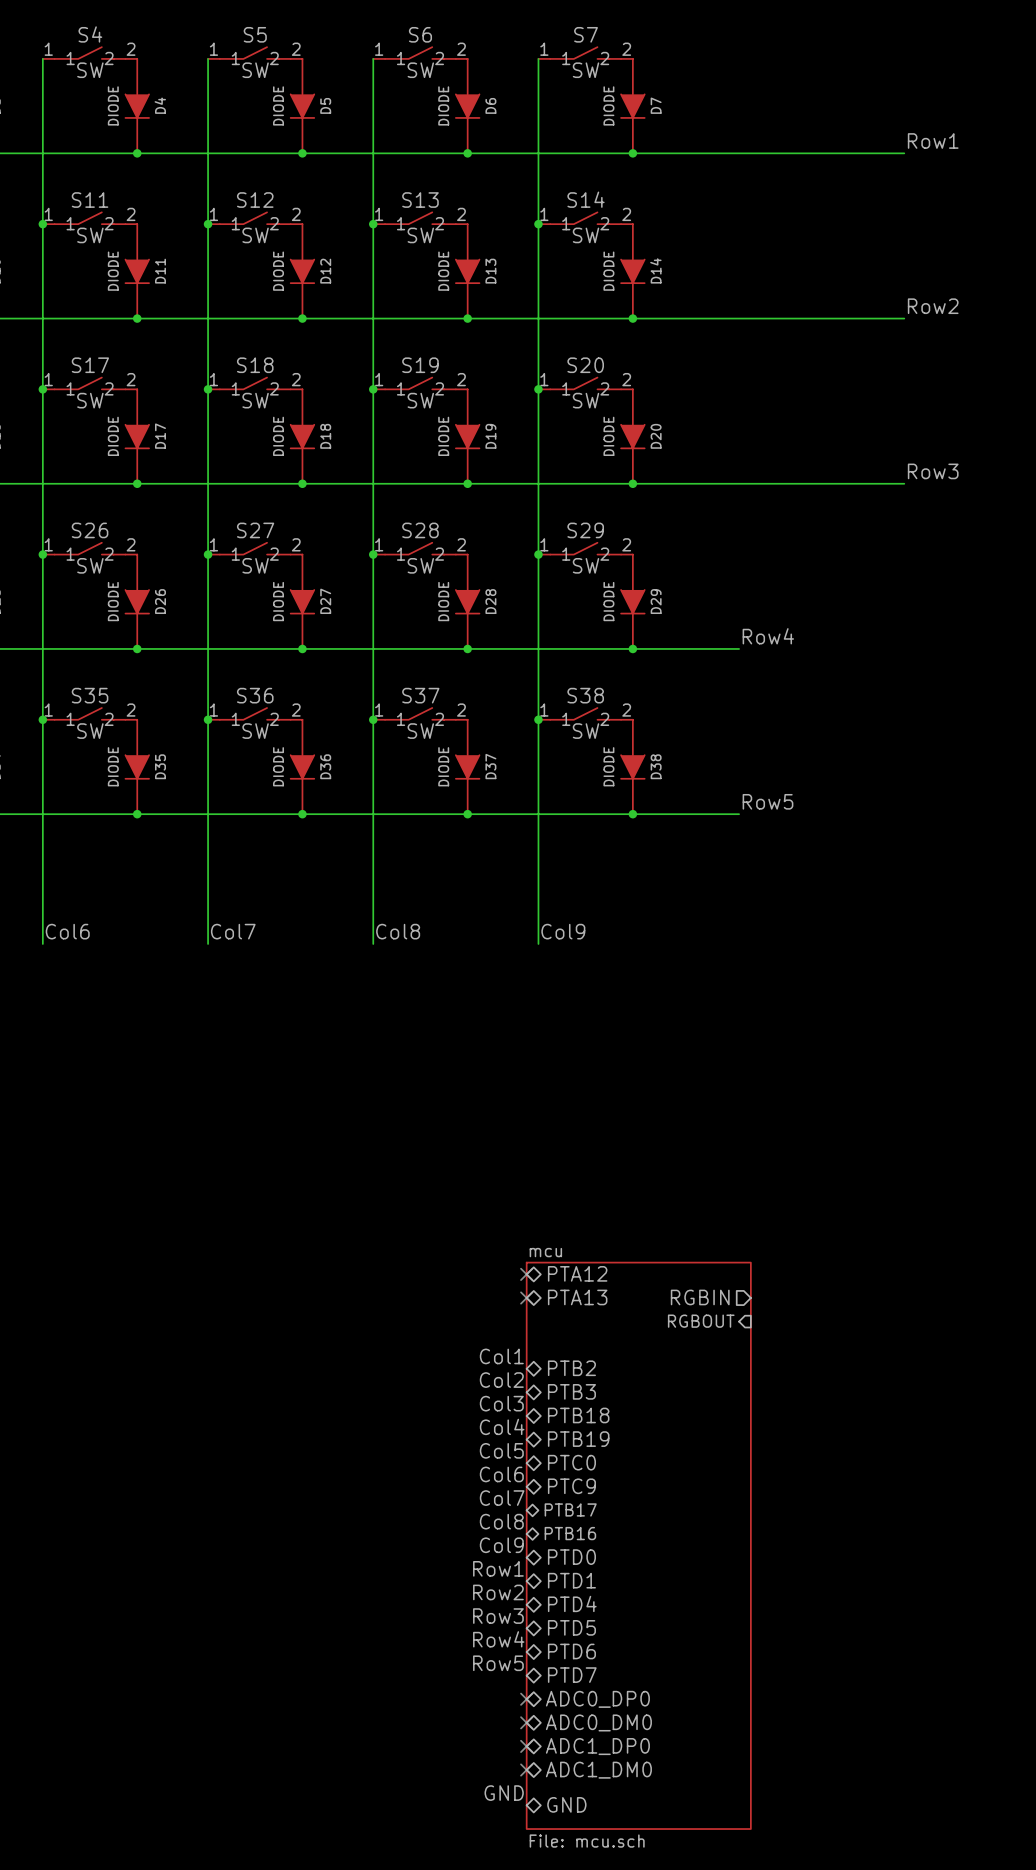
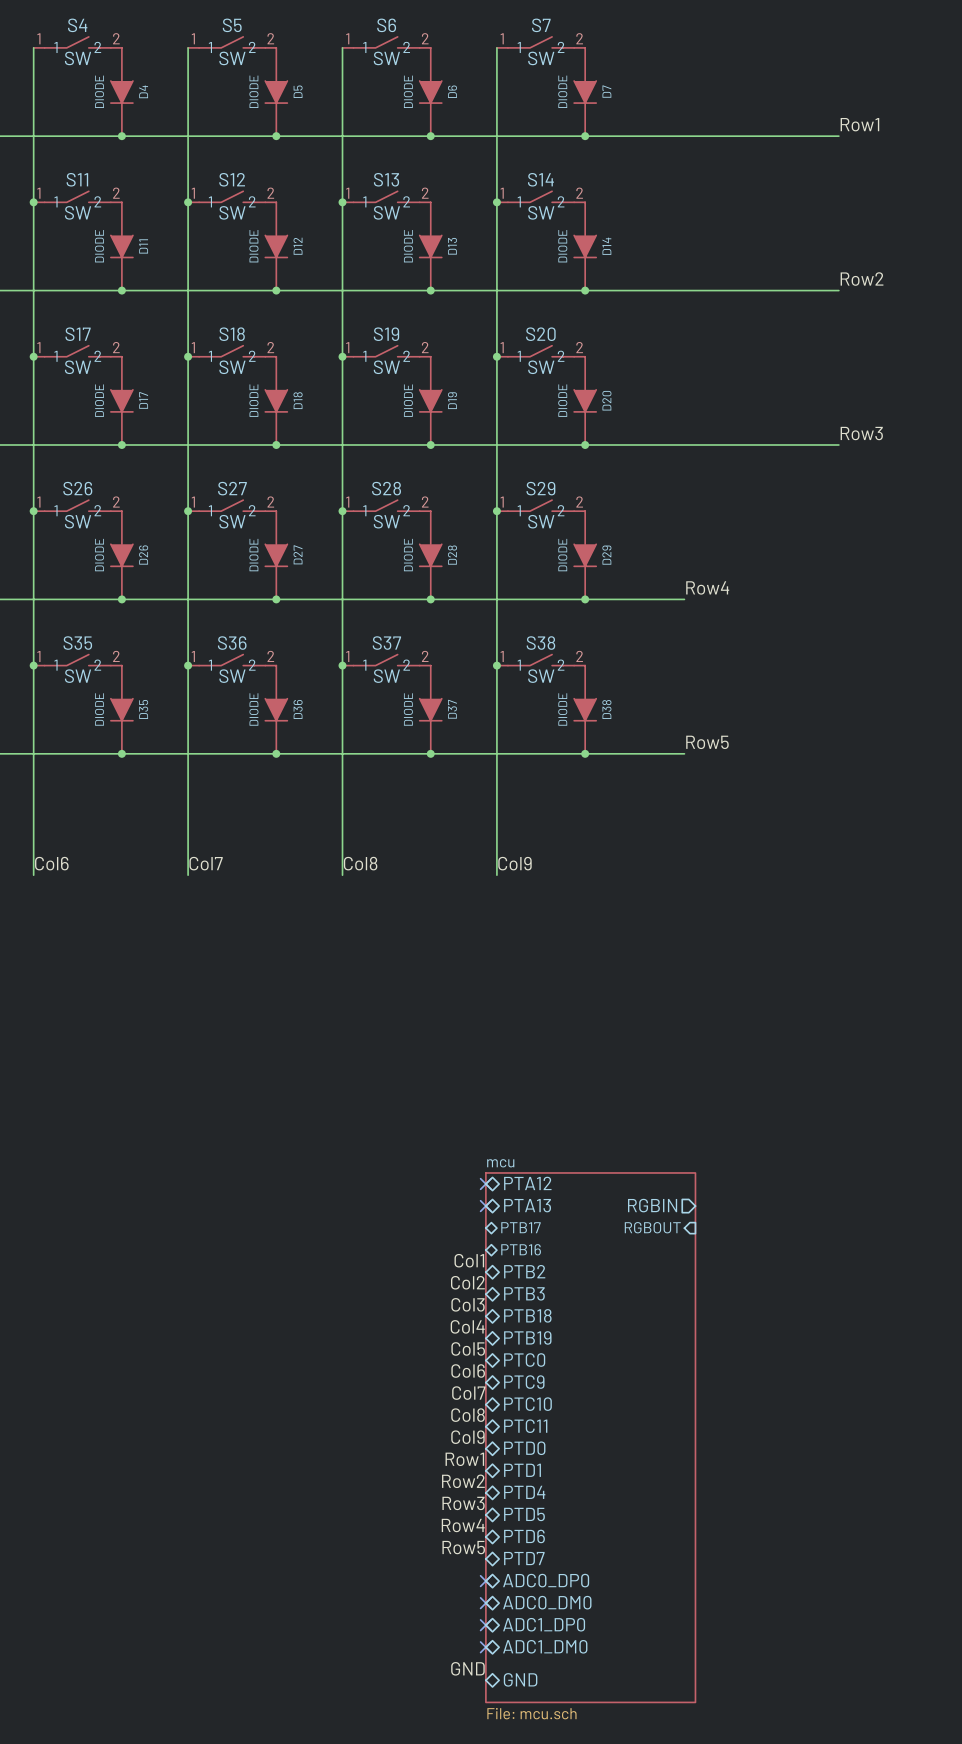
sheet pin position: PTB17 (570, 1509) -> PTB17 (520, 1227)
sheet pin: none -> PTC10 (527, 1404)
sheet pin position: PTB16 (570, 1533) -> PTB16 (521, 1249)
sheet pin: none -> PTC11 (525, 1426)

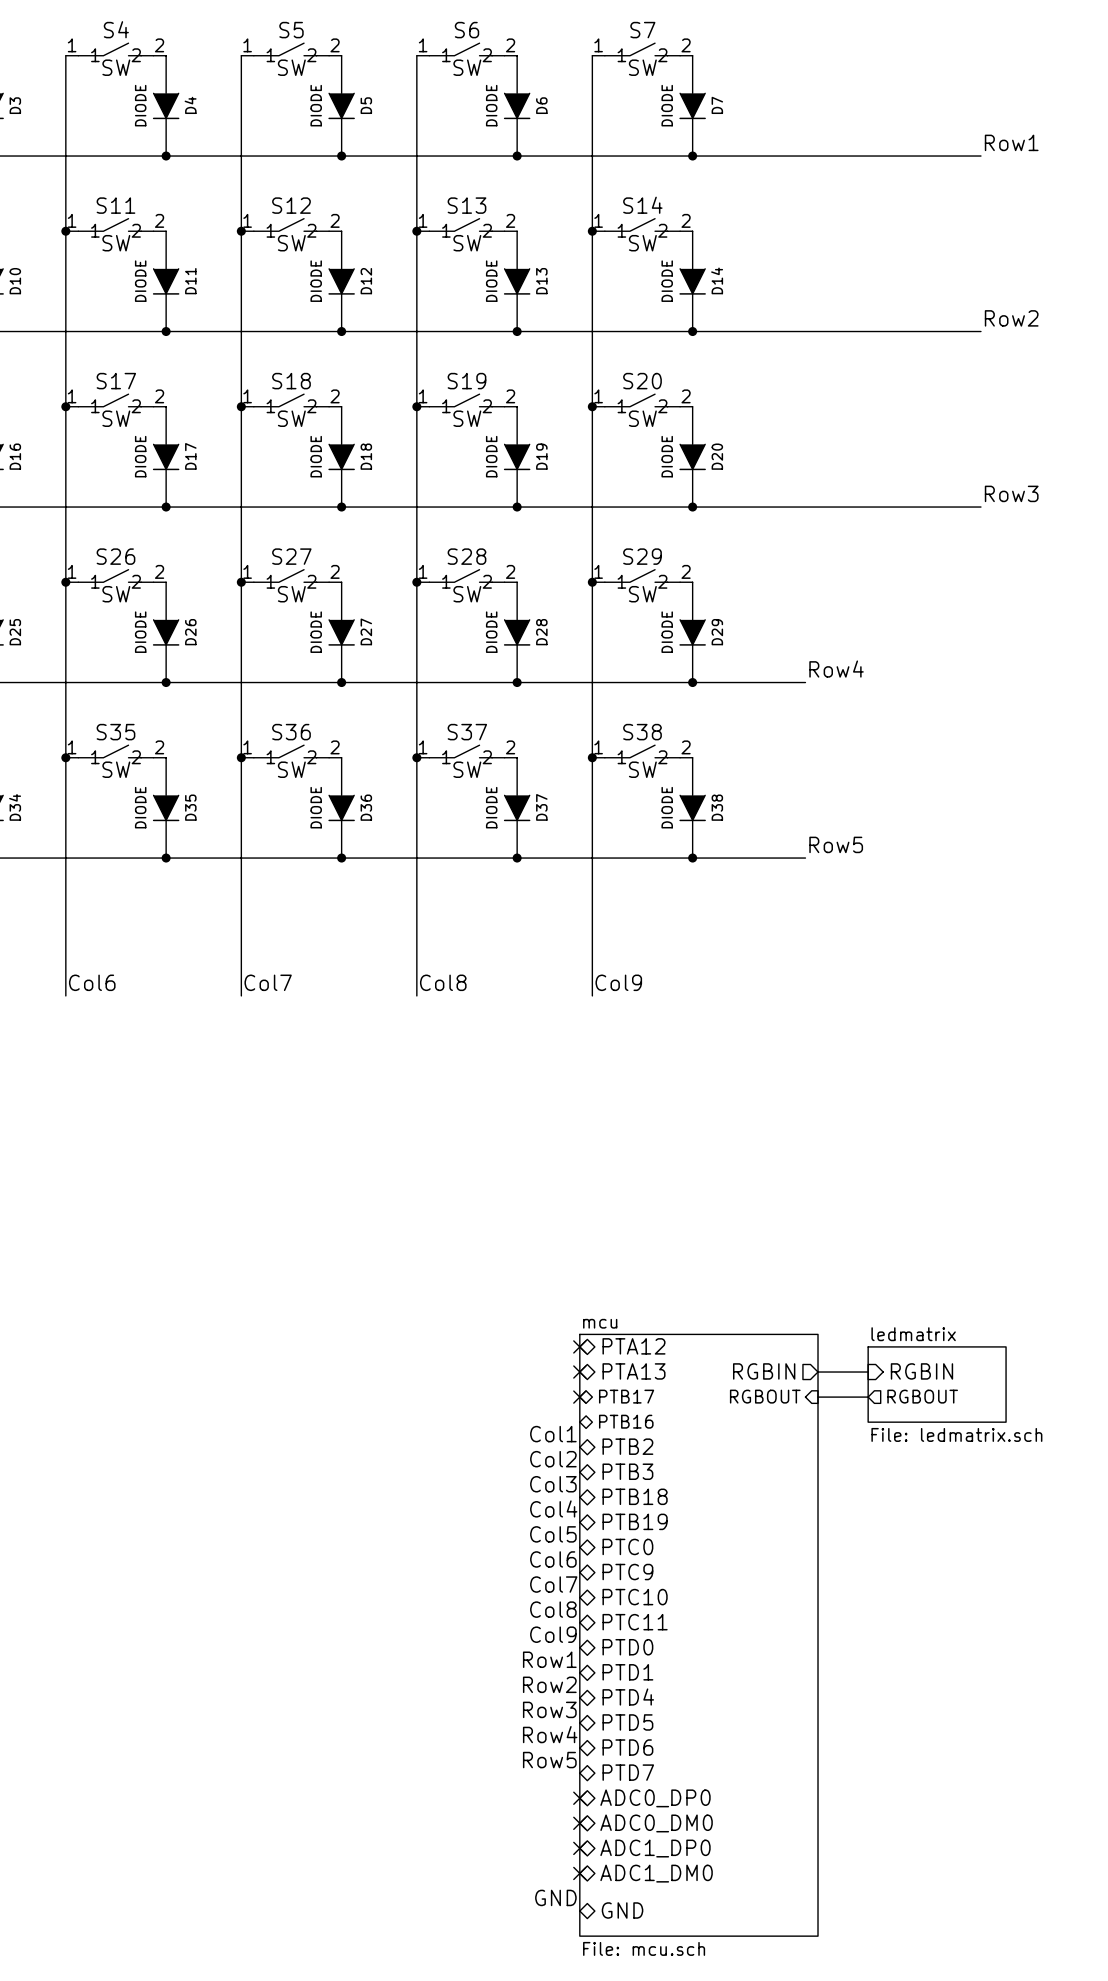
sheet pin: none -> RGBIN (921, 1371)
wire: none -> (818, 1372) (868, 1372)
sheet ledmatrix: none -> File: ledmatrix.sch (937, 1384)
sheet pin: none -> RGBOUT (922, 1396)
no-connect mark: none -> (579, 1397)
wire: none -> (818, 1397) (868, 1397)

